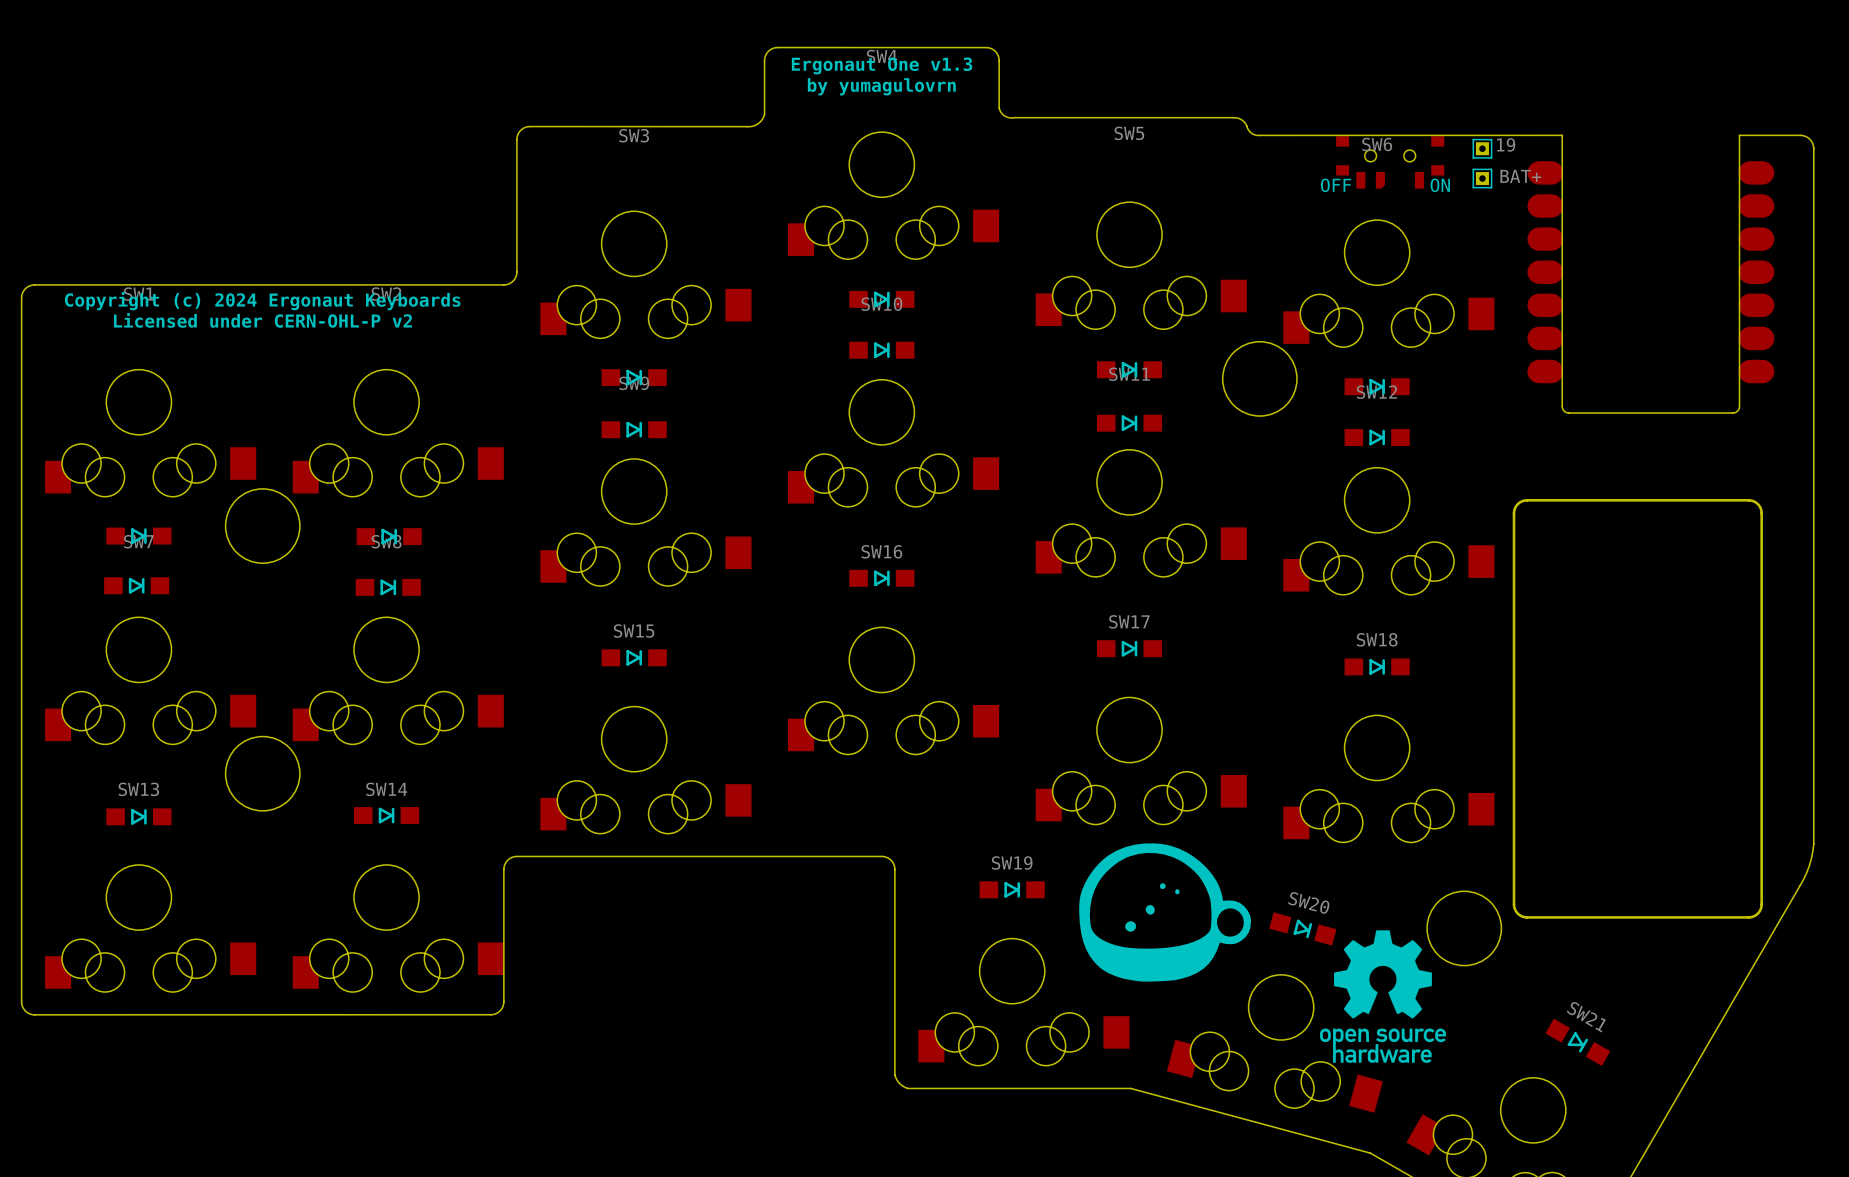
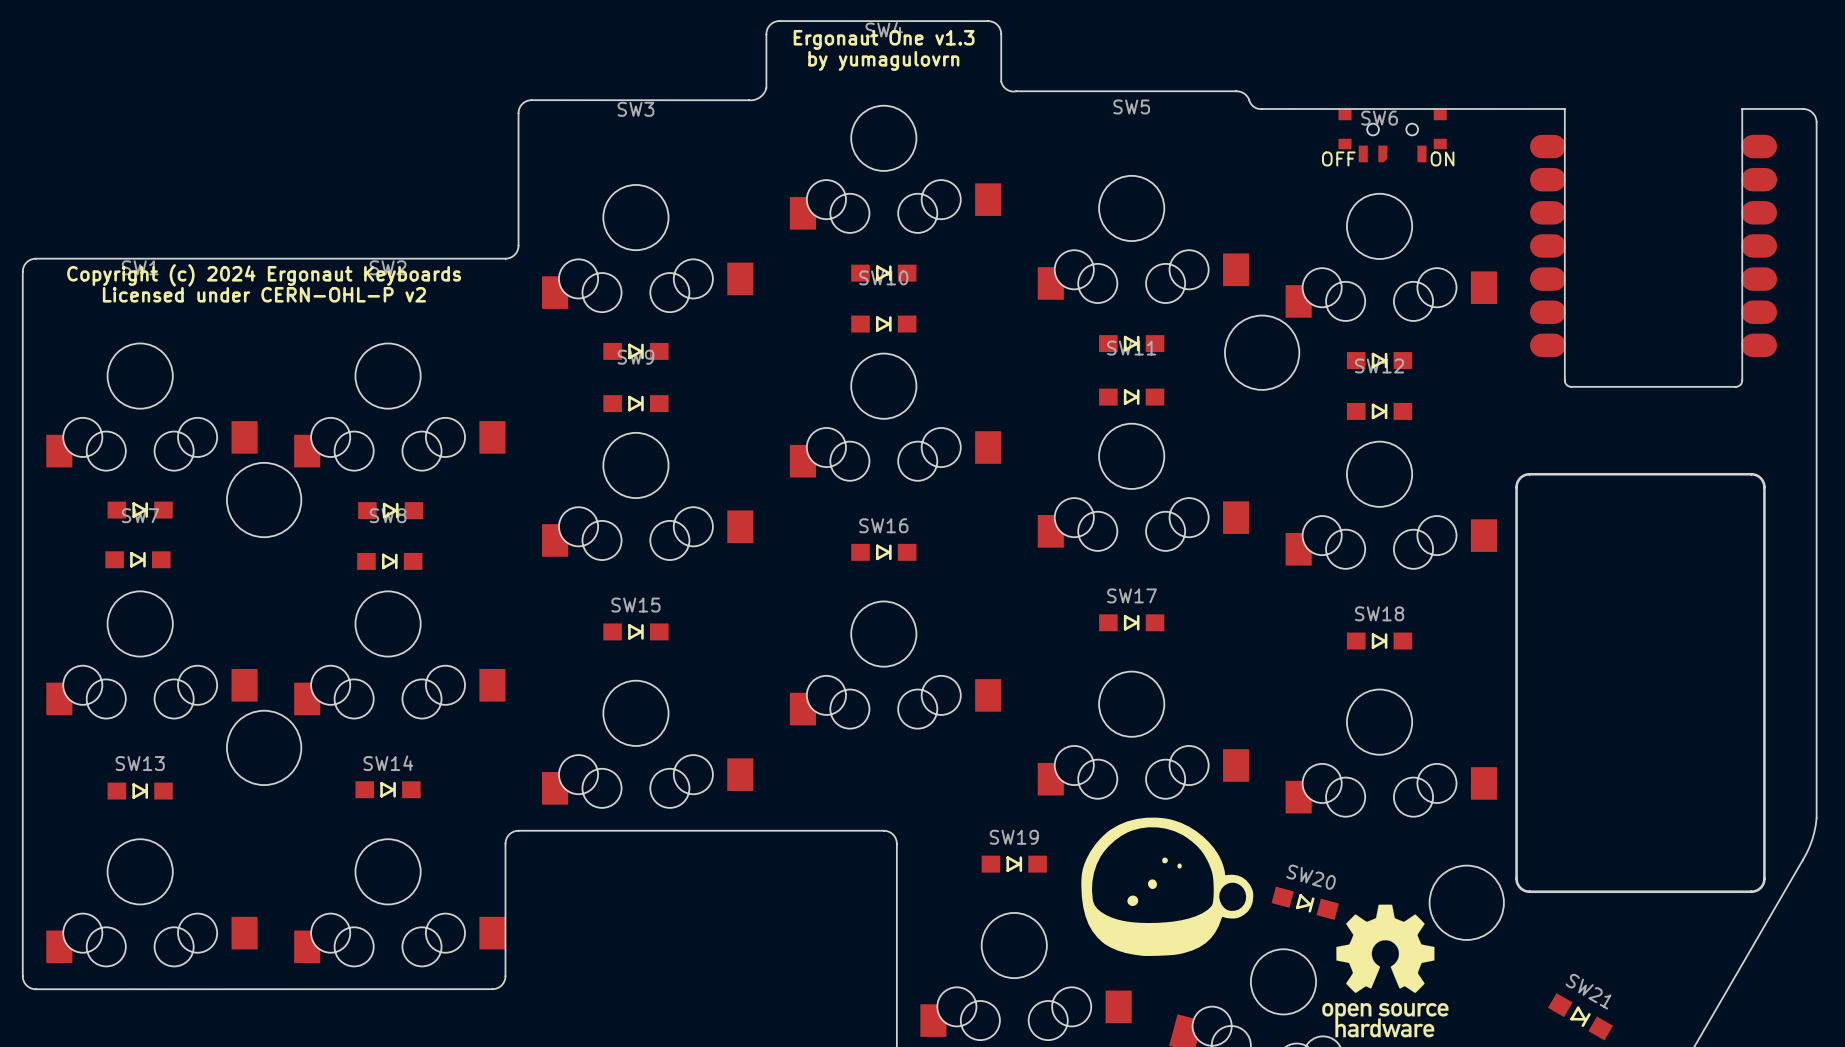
part: 19 (1482, 148) -> none
part: BAT+ (1482, 178) -> none

